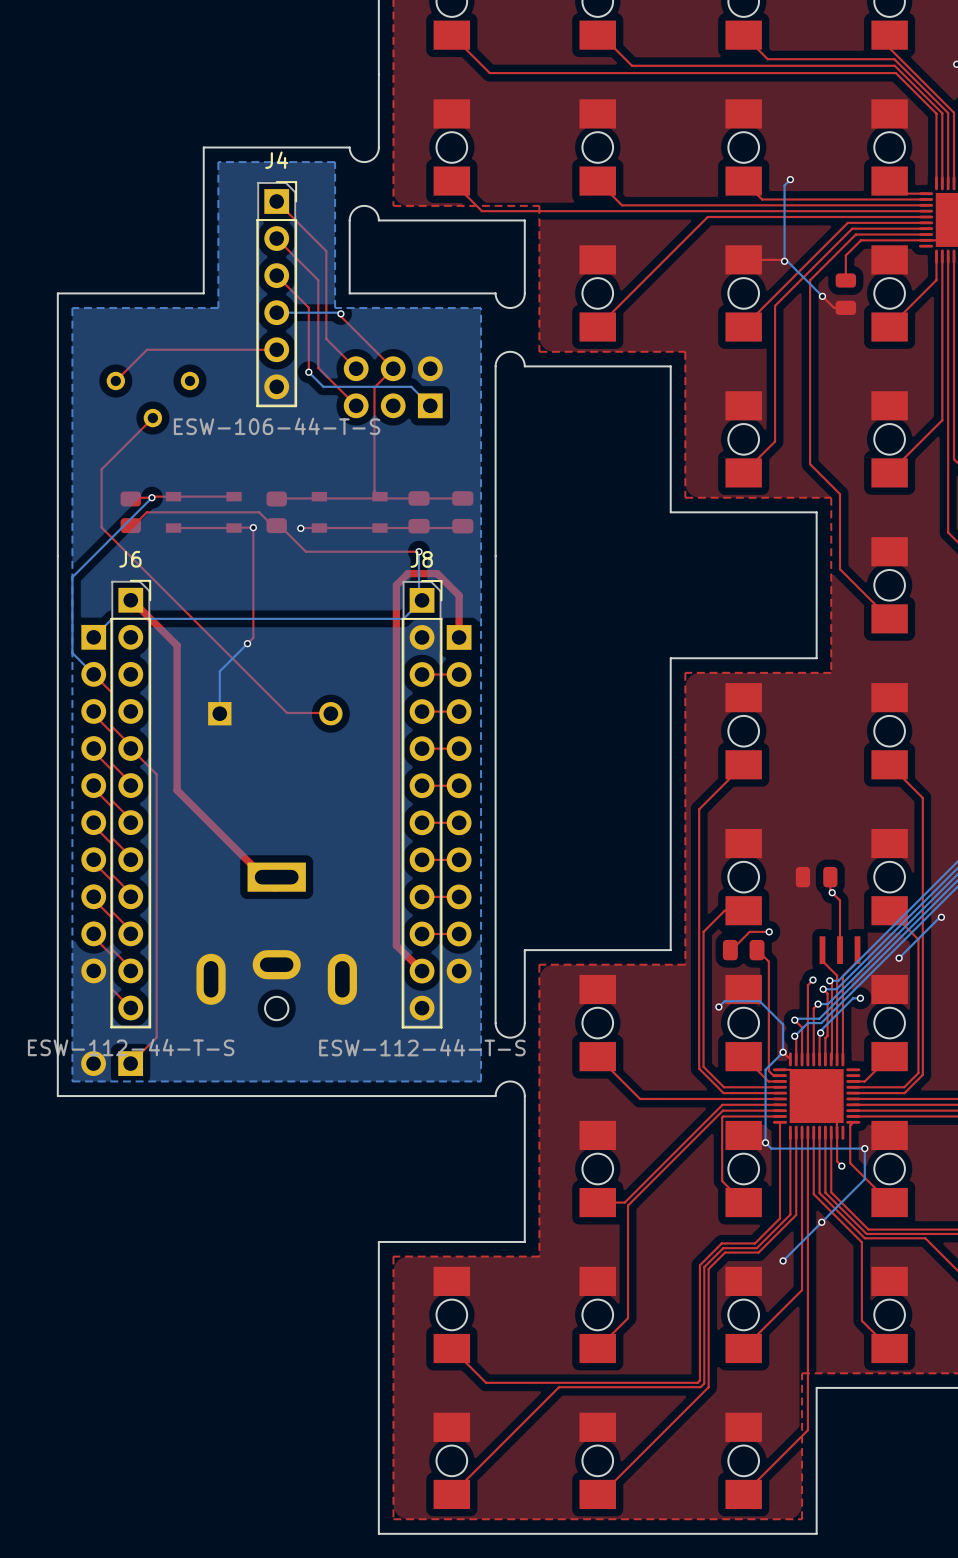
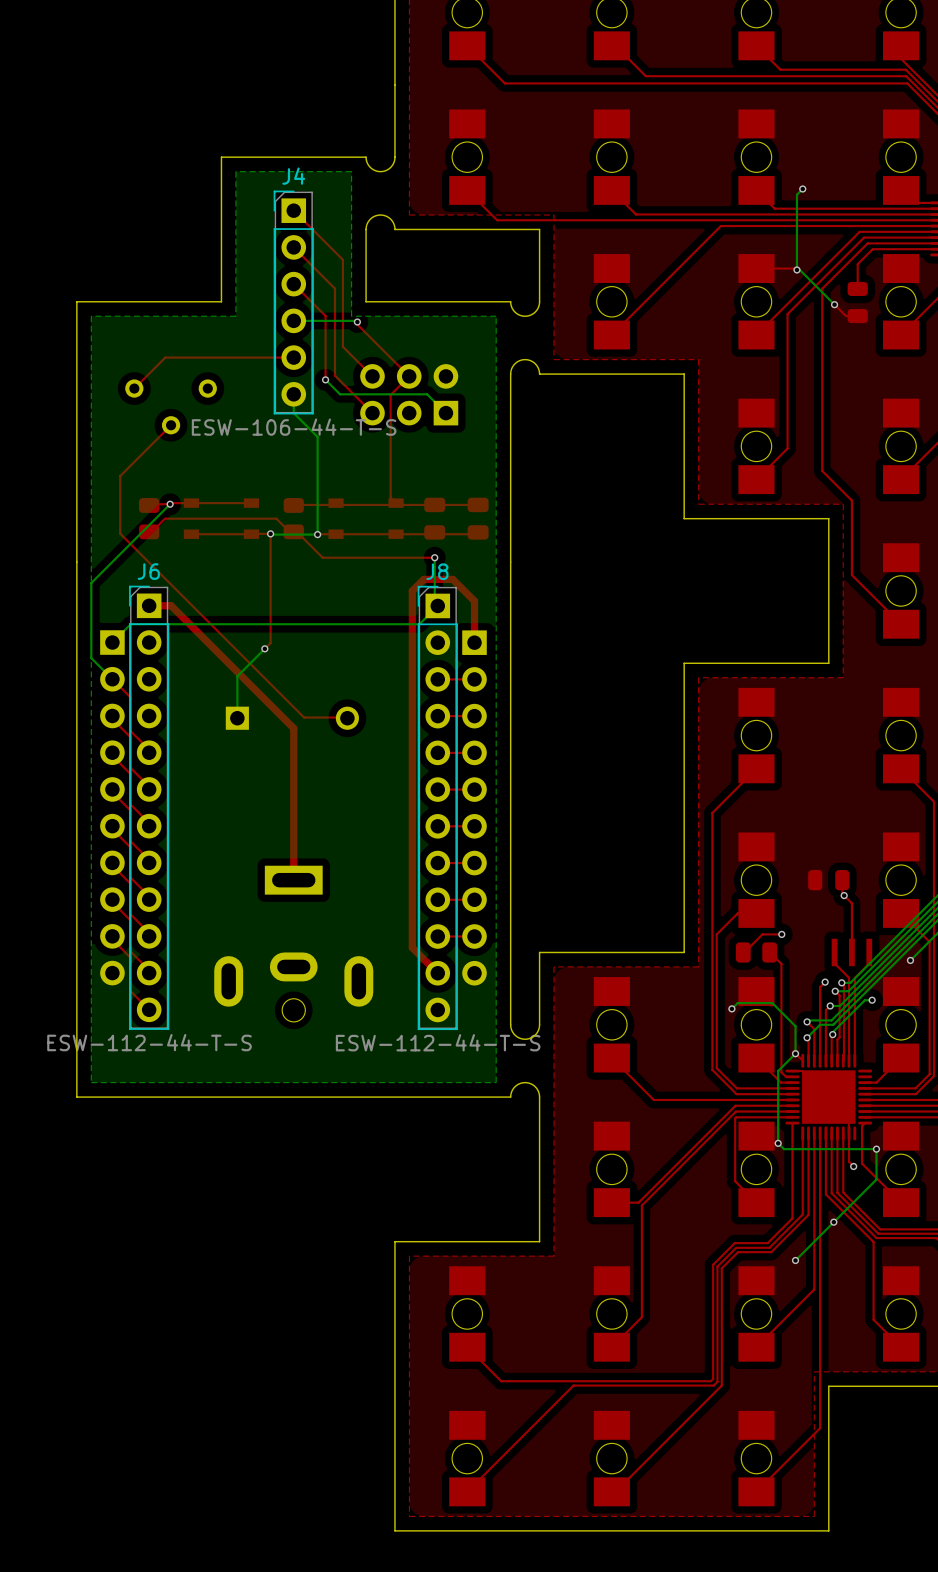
J4 footprint: [256, 181, 298, 408] -> [273, 190, 314, 415]
bottom track: none -> (293, 394) (293, 413) (317, 436) (317, 534) (270, 533)
J6 footprint: [110, 579, 152, 1029] -> [129, 585, 170, 1030]
J8 footprint: [401, 580, 443, 1029] -> [417, 585, 458, 1031]
top track: (131, 600) (177, 645) (177, 790) (276, 887) -> (150, 605) (171, 605) (293, 728) (293, 890)
top track: (130, 748) (156, 774) (156, 1037) (130, 1063) -> none
part: (112, 1063) -> none

